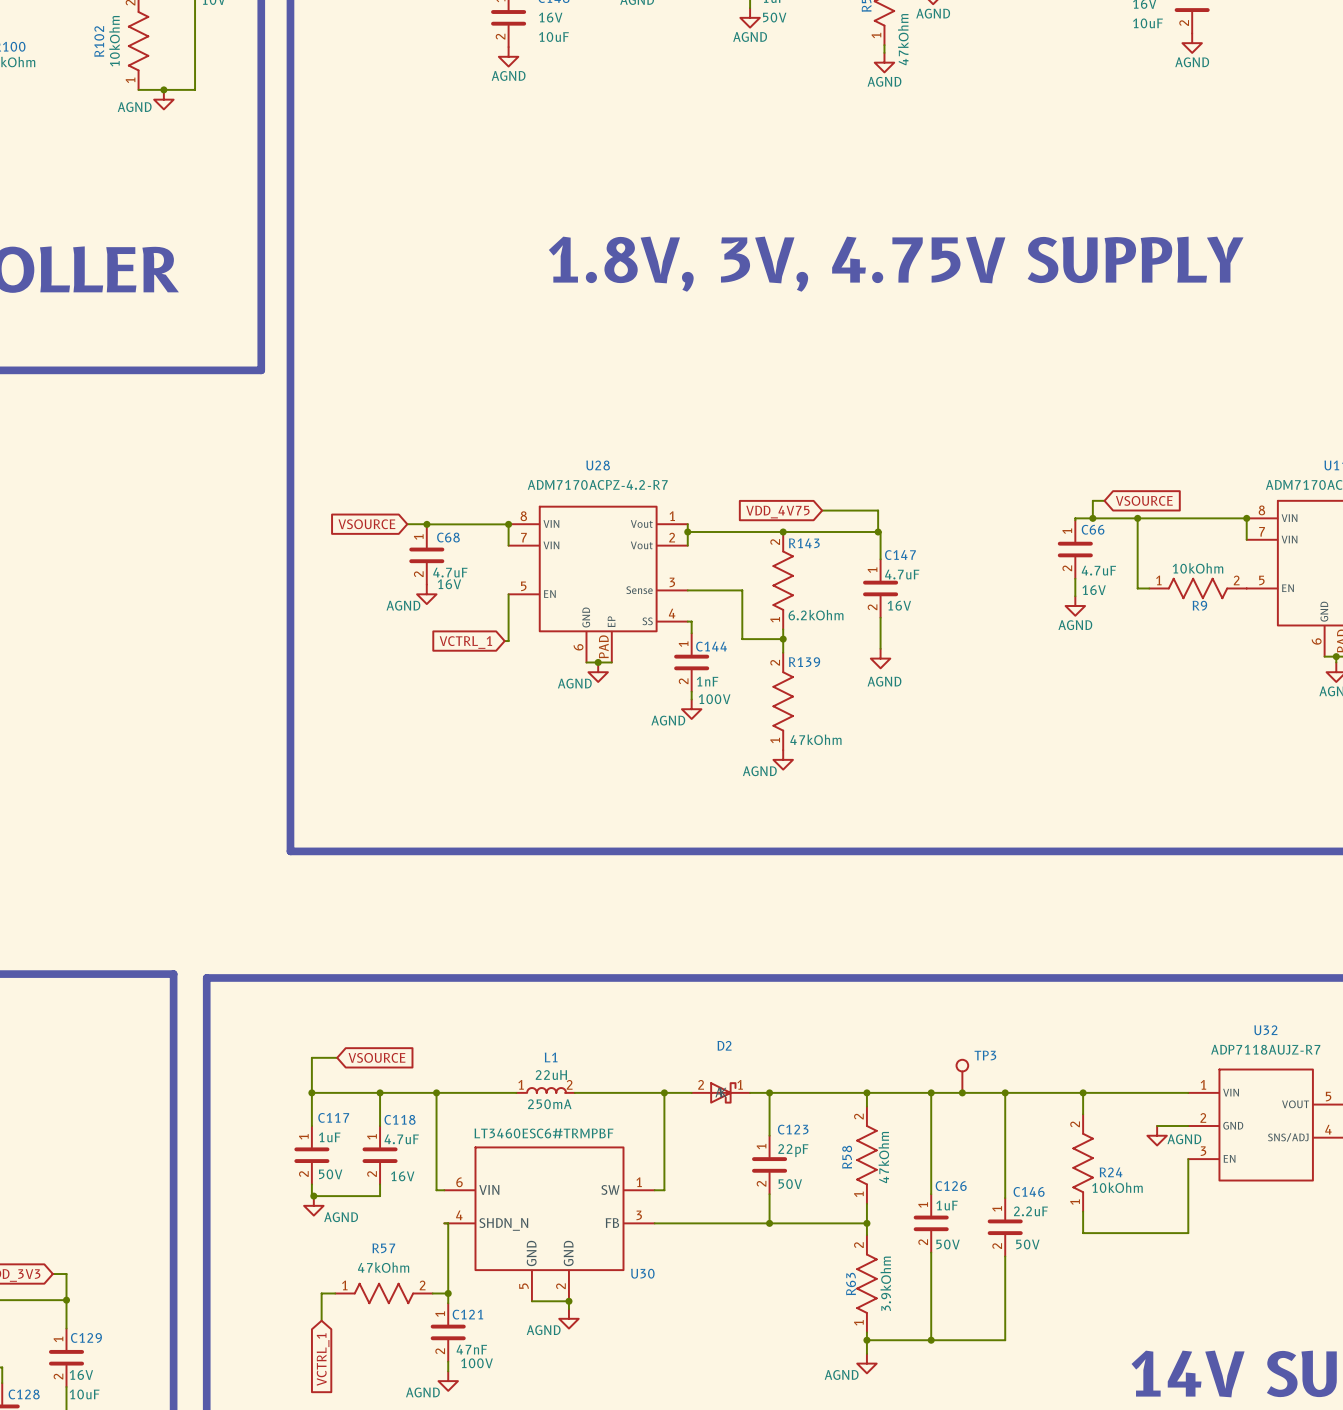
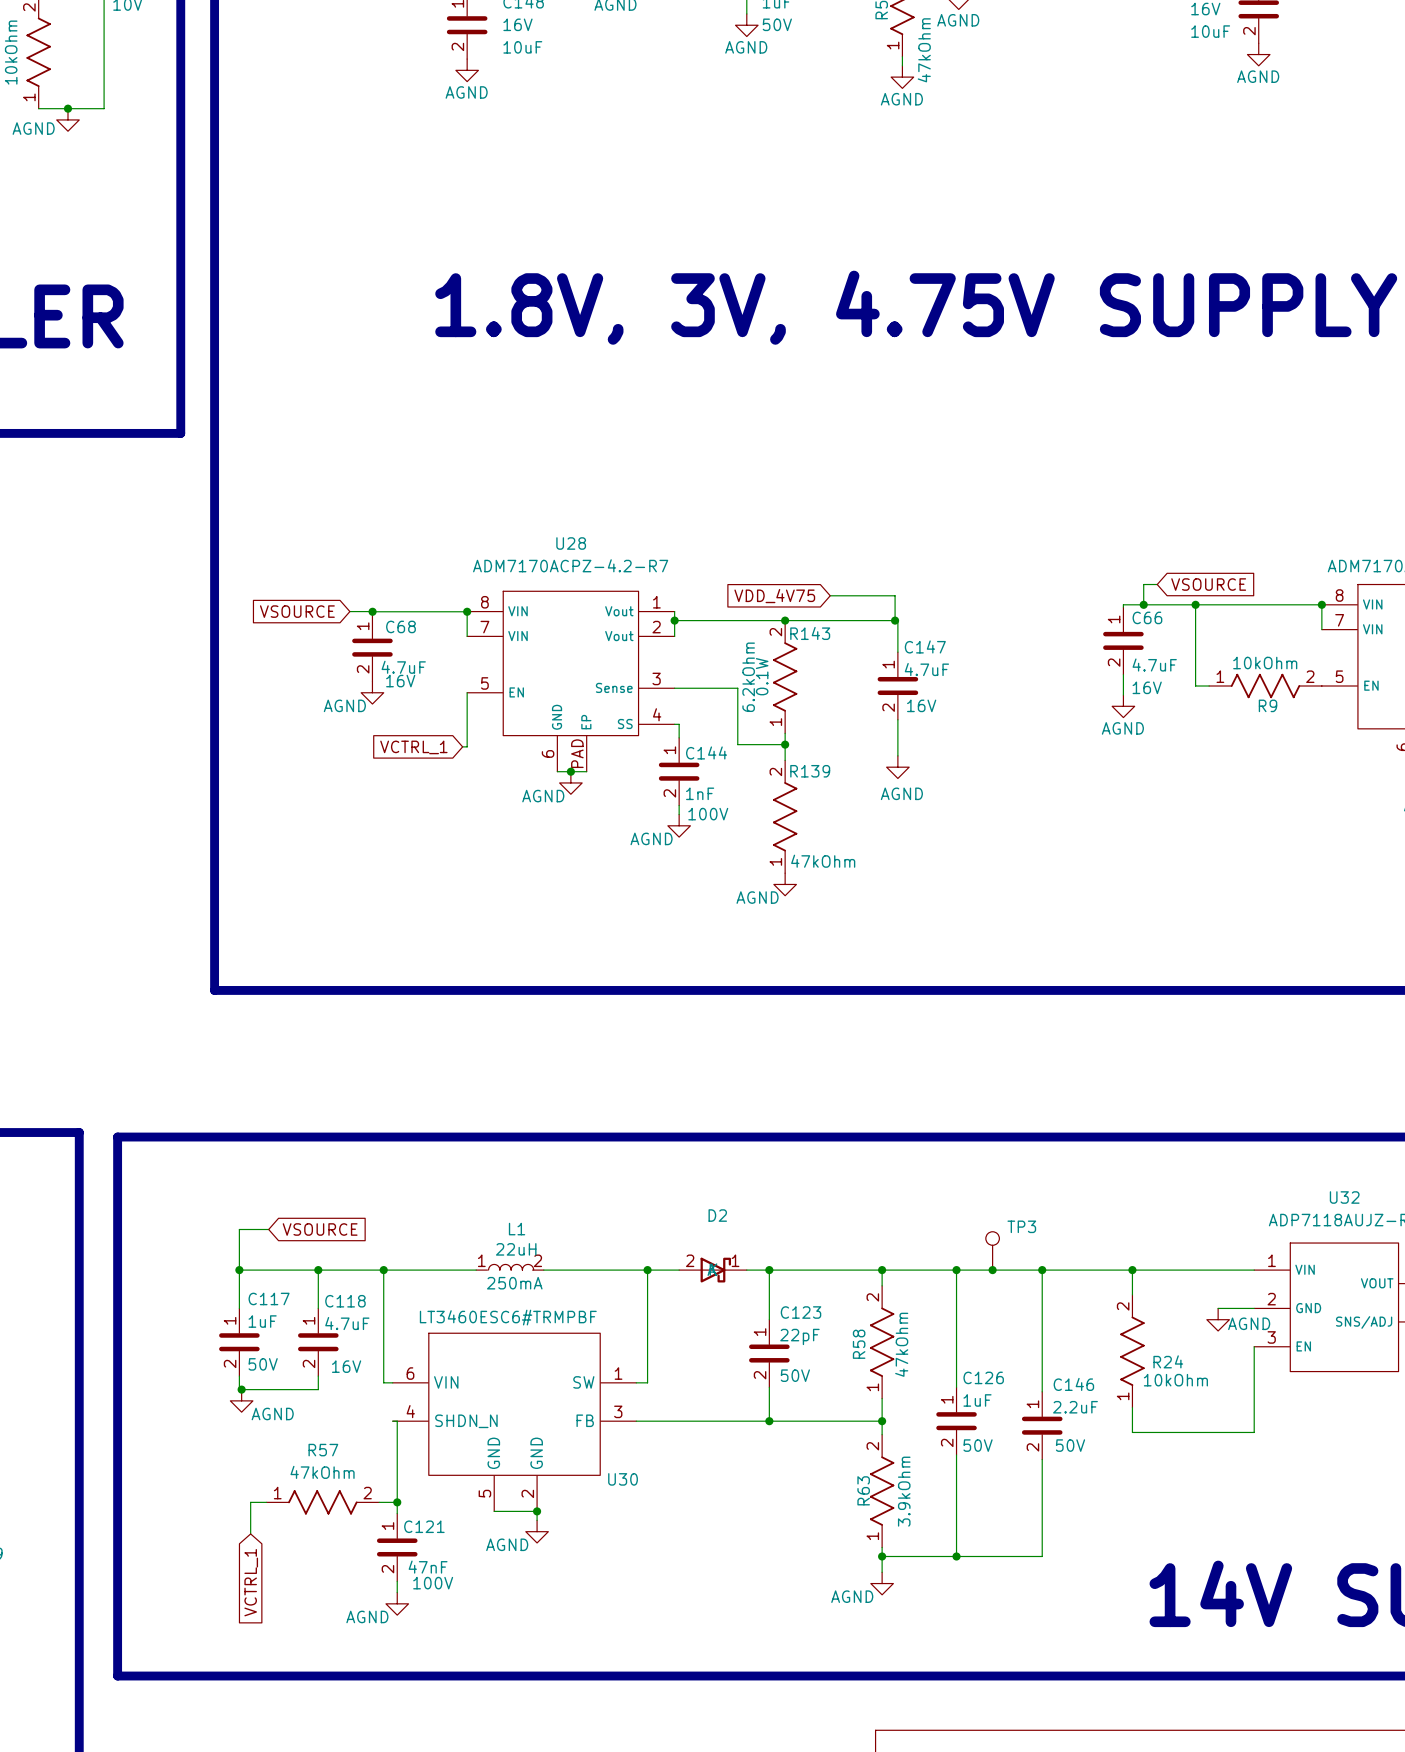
R143 text: none -> 0.1W (762, 676)
R143 text rotation: 0° (816, 615) -> 90° counterclockwise (748, 677)

